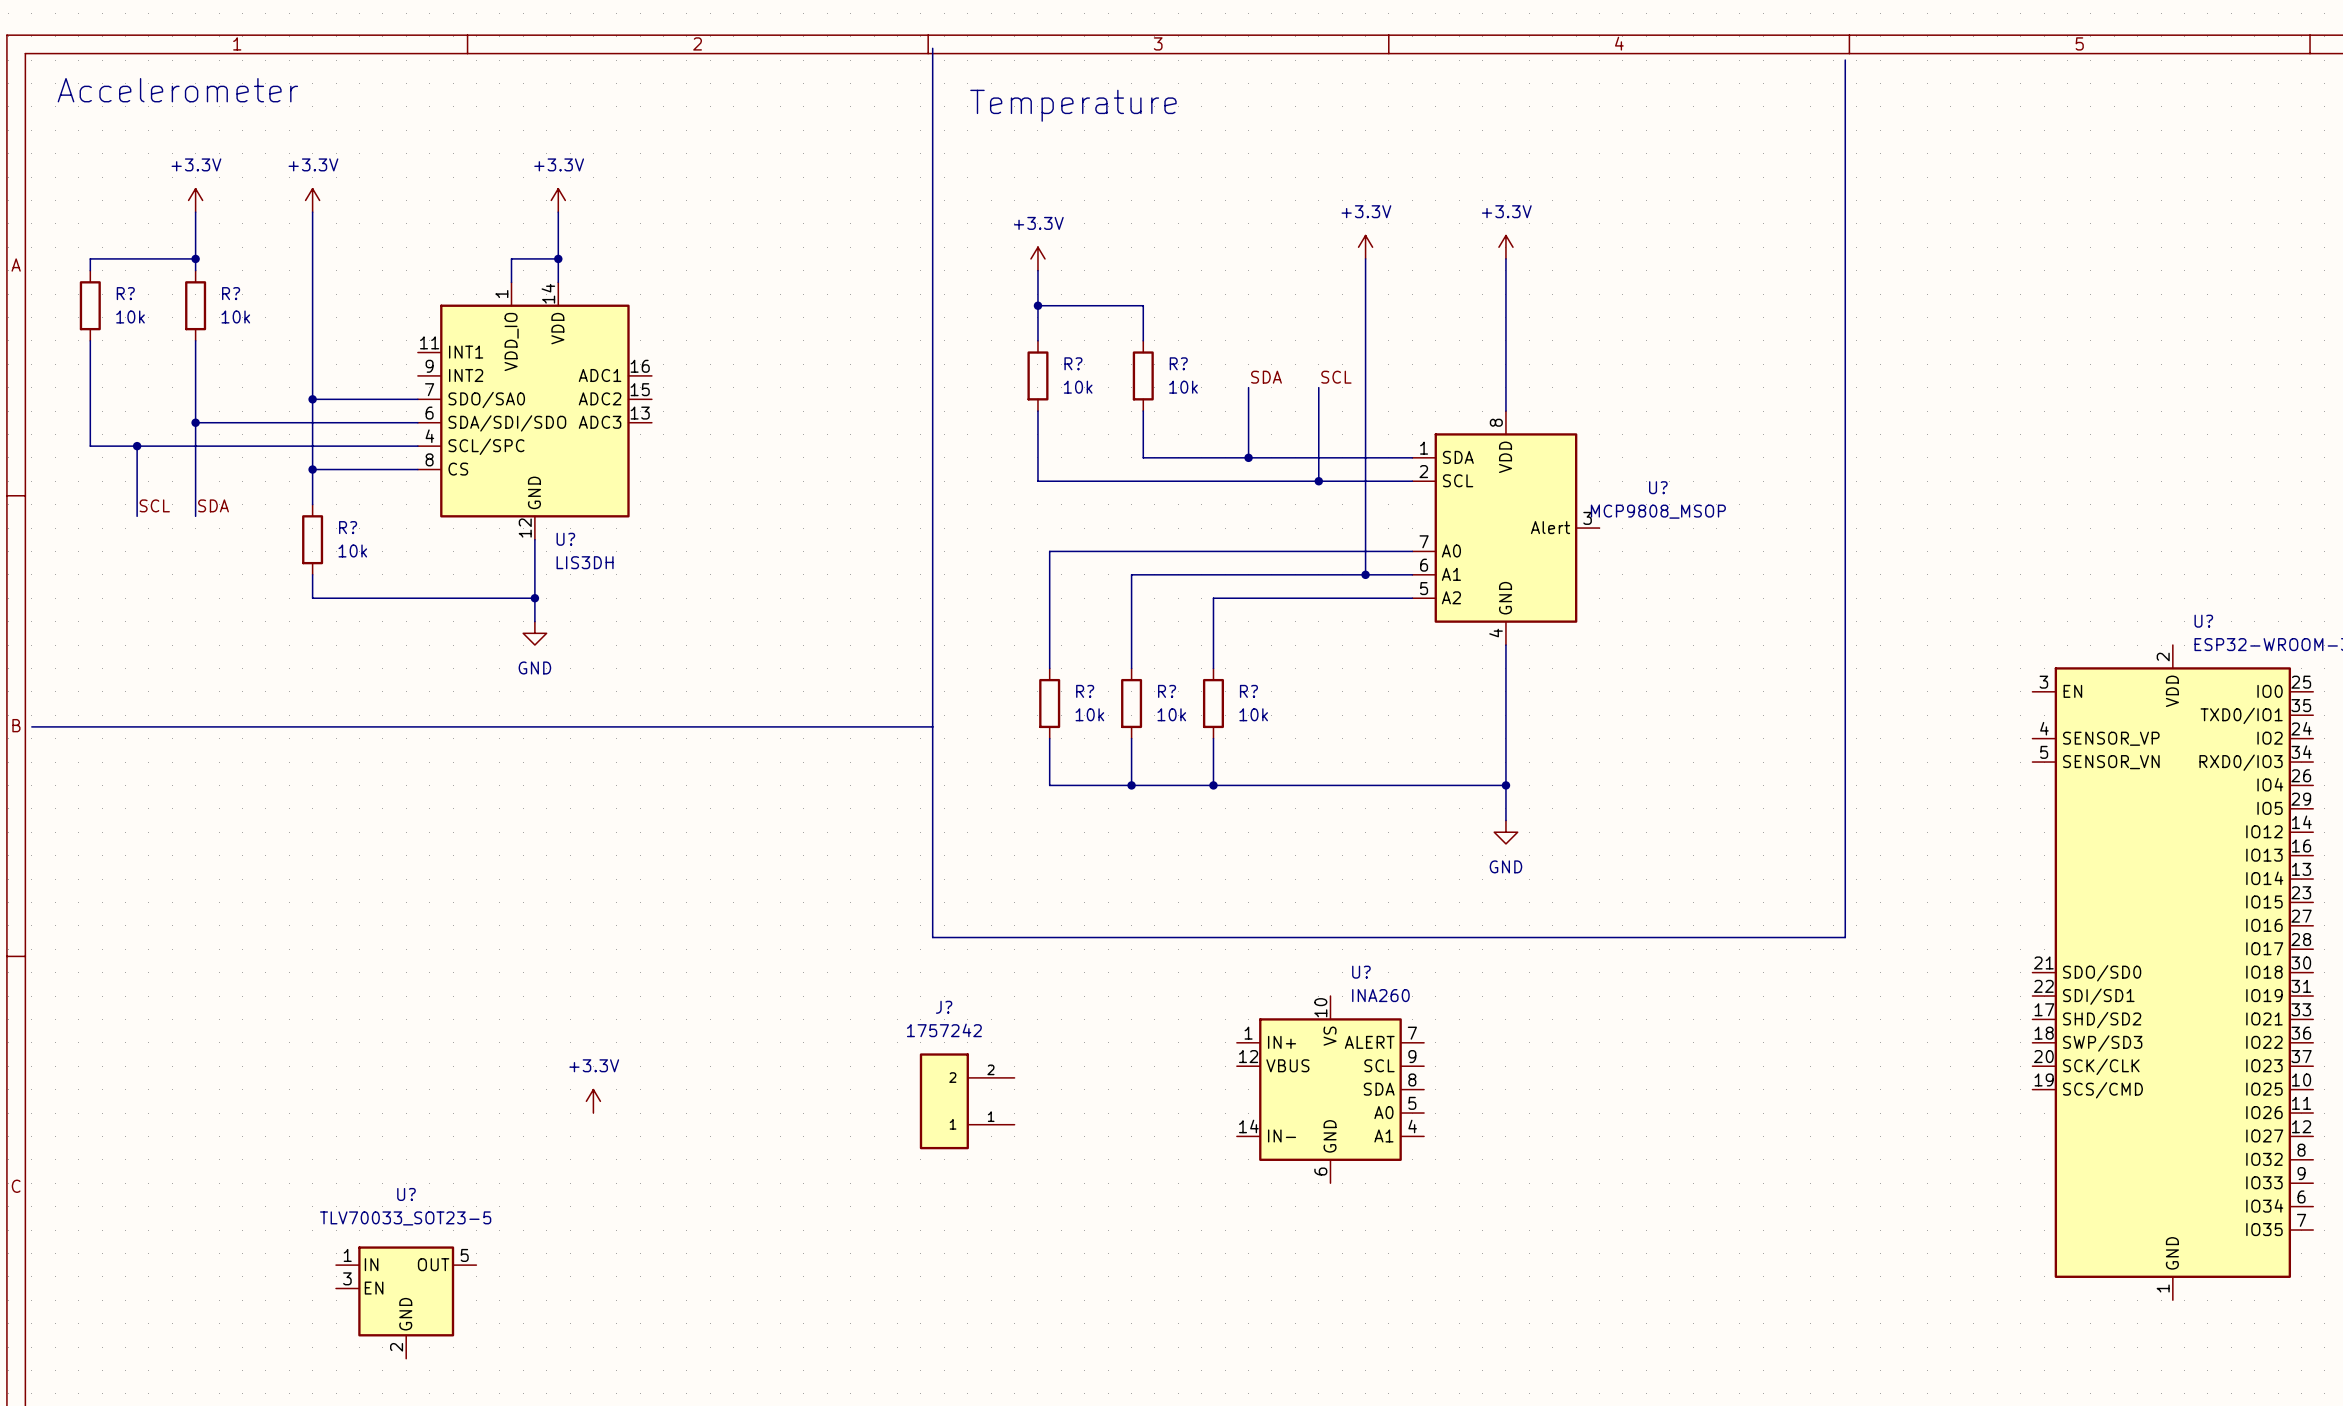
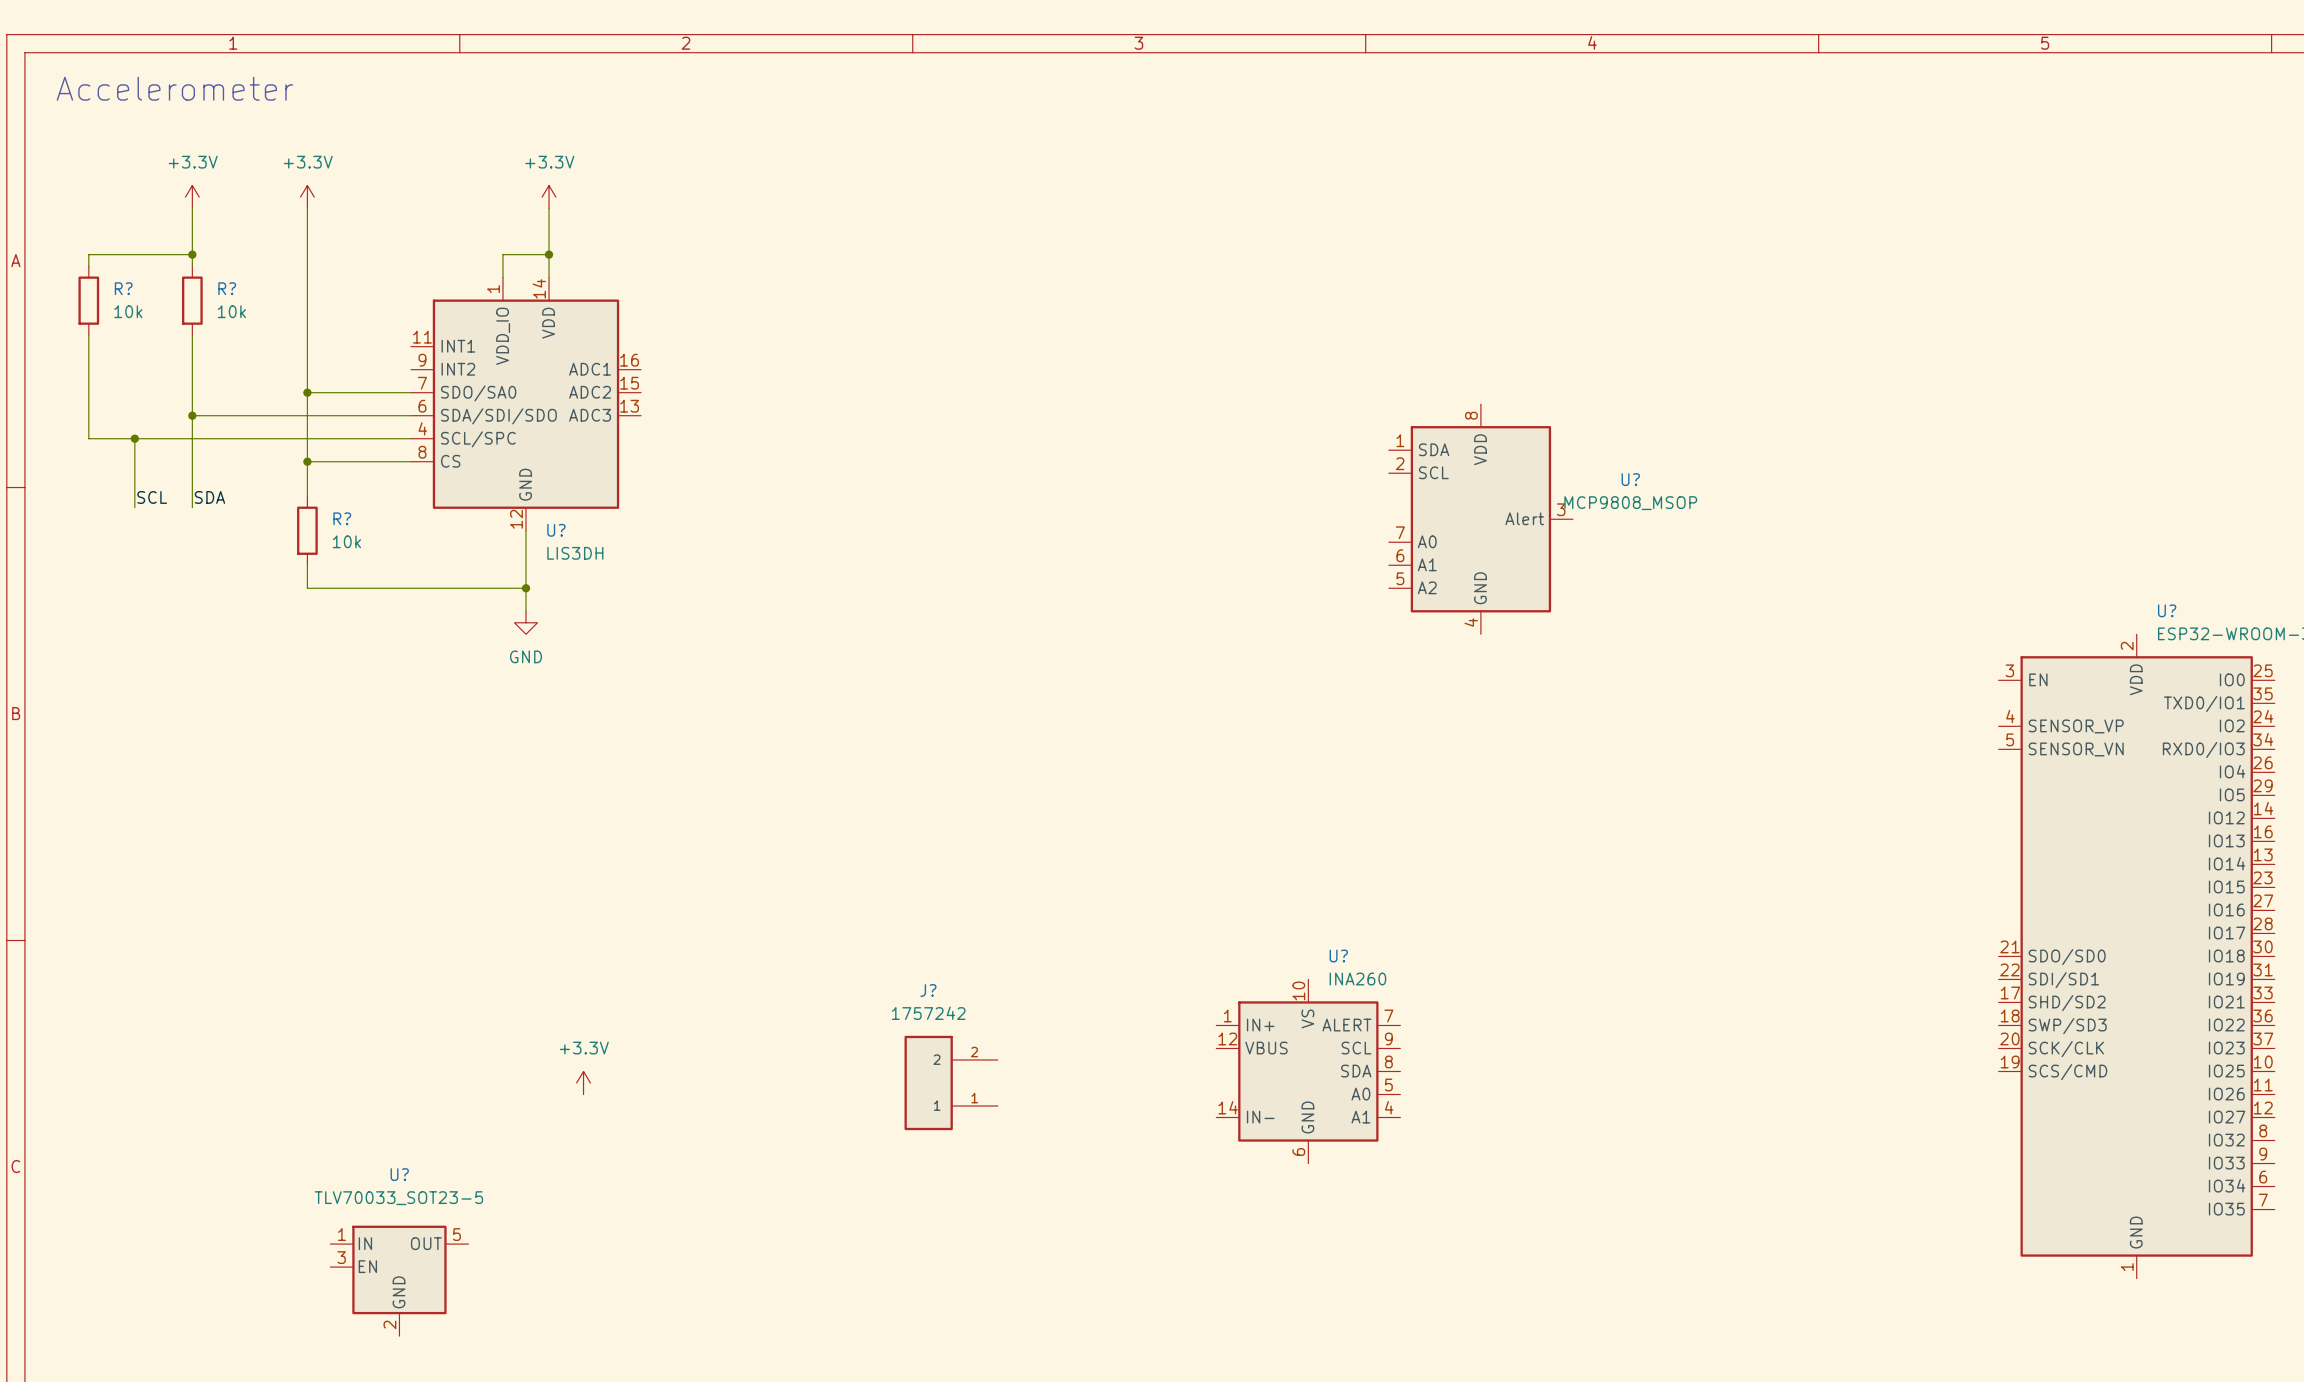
line: (932, 48) (932, 937) (1845, 937) (1845, 60) -> none
text: Temperature (1073, 105) -> none
power symbol: +3.3V (1365, 247) -> none
power symbol: +3.3V (1505, 247) -> none
power symbol: +3.3V (1037, 258) -> none
wire: (1365, 258) (1365, 574) -> none
wire: (1505, 258) (1505, 411) -> none
wire: (1037, 270) (1037, 340) -> none
wire: (1037, 305) (1143, 305) (1143, 340) -> none
junction: (1037, 305) -> none
R?: 10k (1037, 375) -> none
R?: 10k (1143, 375) -> none
label: SDA (1266, 377) -> none
label: SCL (1336, 377) -> none
wire: (1248, 387) (1248, 457) -> none
wire: (1318, 387) (1318, 481) -> none
wire: (1037, 411) (1037, 481) (1412, 481) -> none
wire: (1143, 411) (1143, 457) (1412, 457) -> none
junction: (1248, 457) -> none
junction: (1318, 481) -> none
wire: (1412, 551) (1049, 551) (1049, 668) -> none
junction: (1365, 574) -> none
wire: (1412, 574) (1131, 574) (1131, 668) -> none
wire: (1412, 598) (1213, 598) (1213, 668) -> none
wire: (1505, 645) (1505, 820) -> none
R?: 10k (1049, 703) -> none
R?: 10k (1131, 703) -> none
R?: 10k (1213, 703) -> none
line: (31, 726) (932, 726) -> none
wire: (1049, 738) (1049, 785) (1505, 785) -> none
wire: (1131, 738) (1131, 785) -> none
wire: (1213, 738) (1213, 785) -> none
junction: (1131, 785) -> none
junction: (1213, 785) -> none
junction: (1505, 785) -> none
power symbol: GND (1505, 832) -> none

